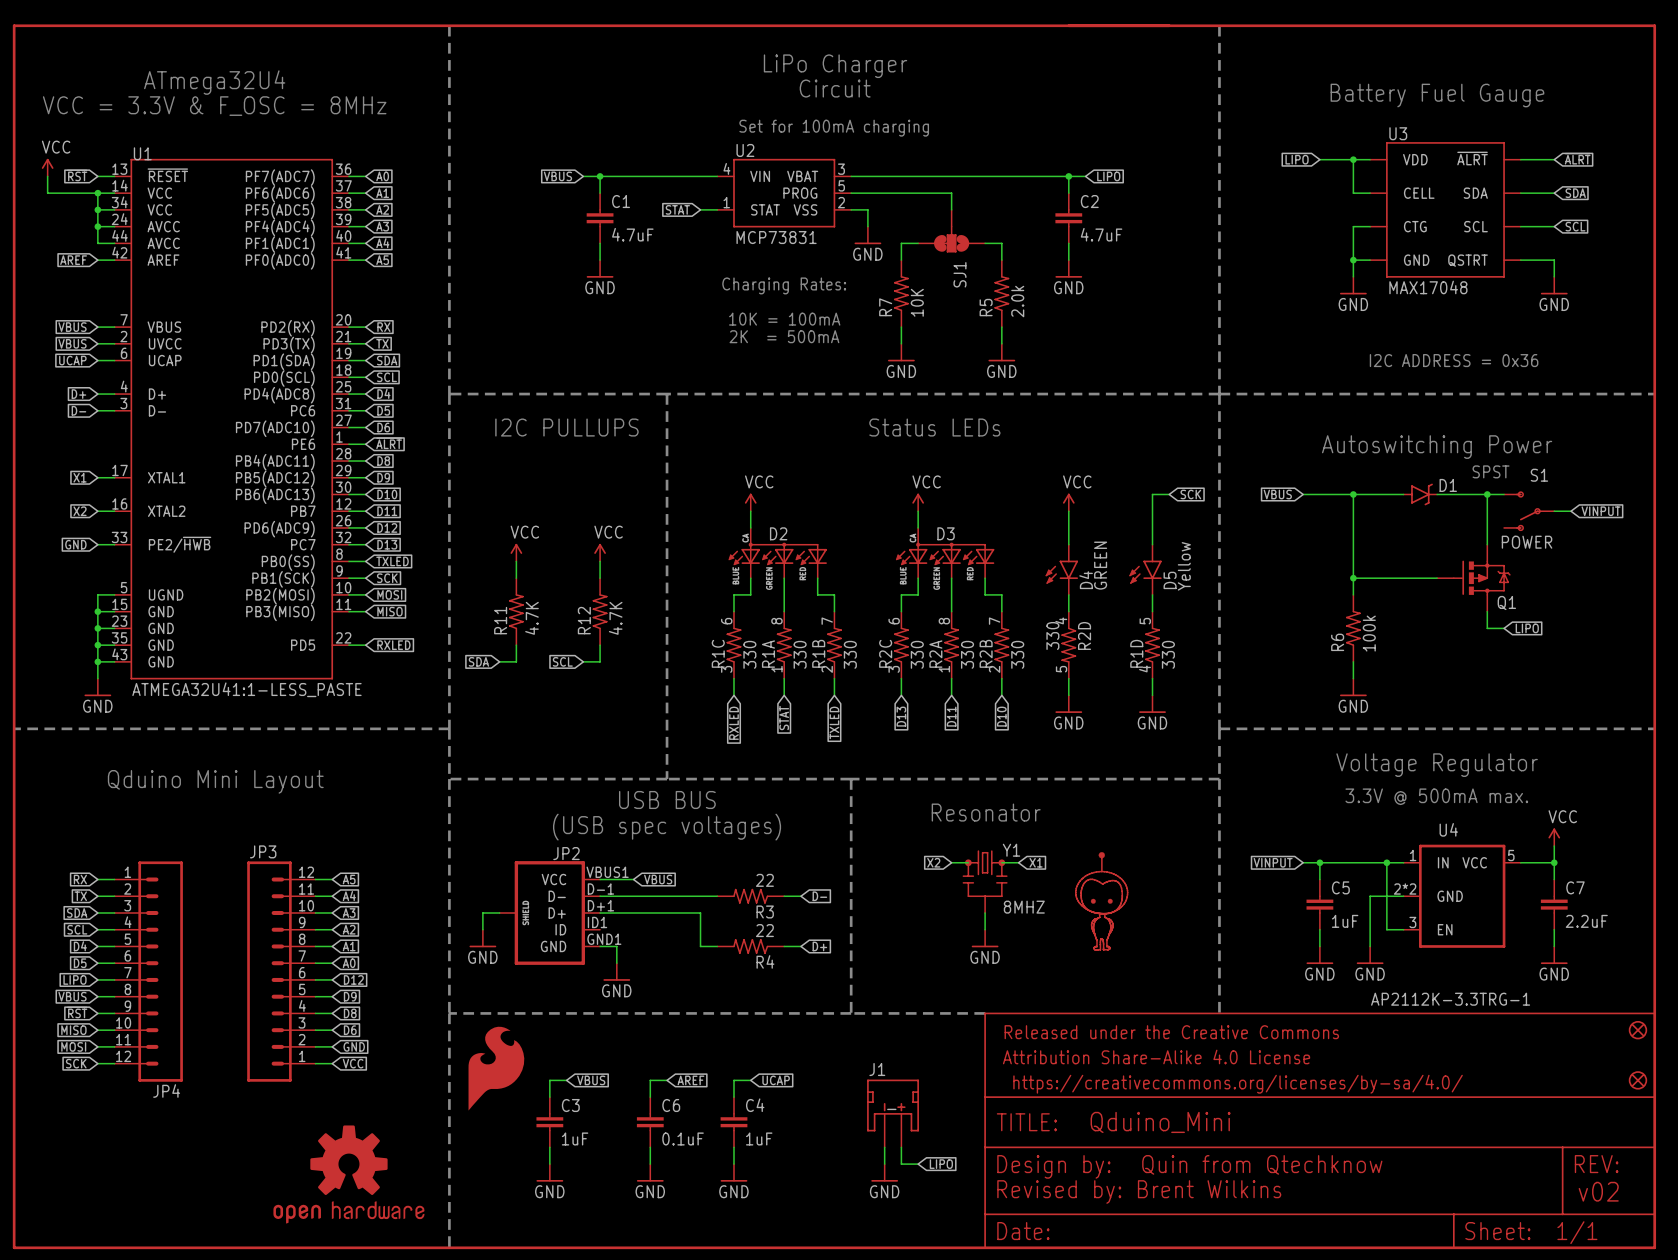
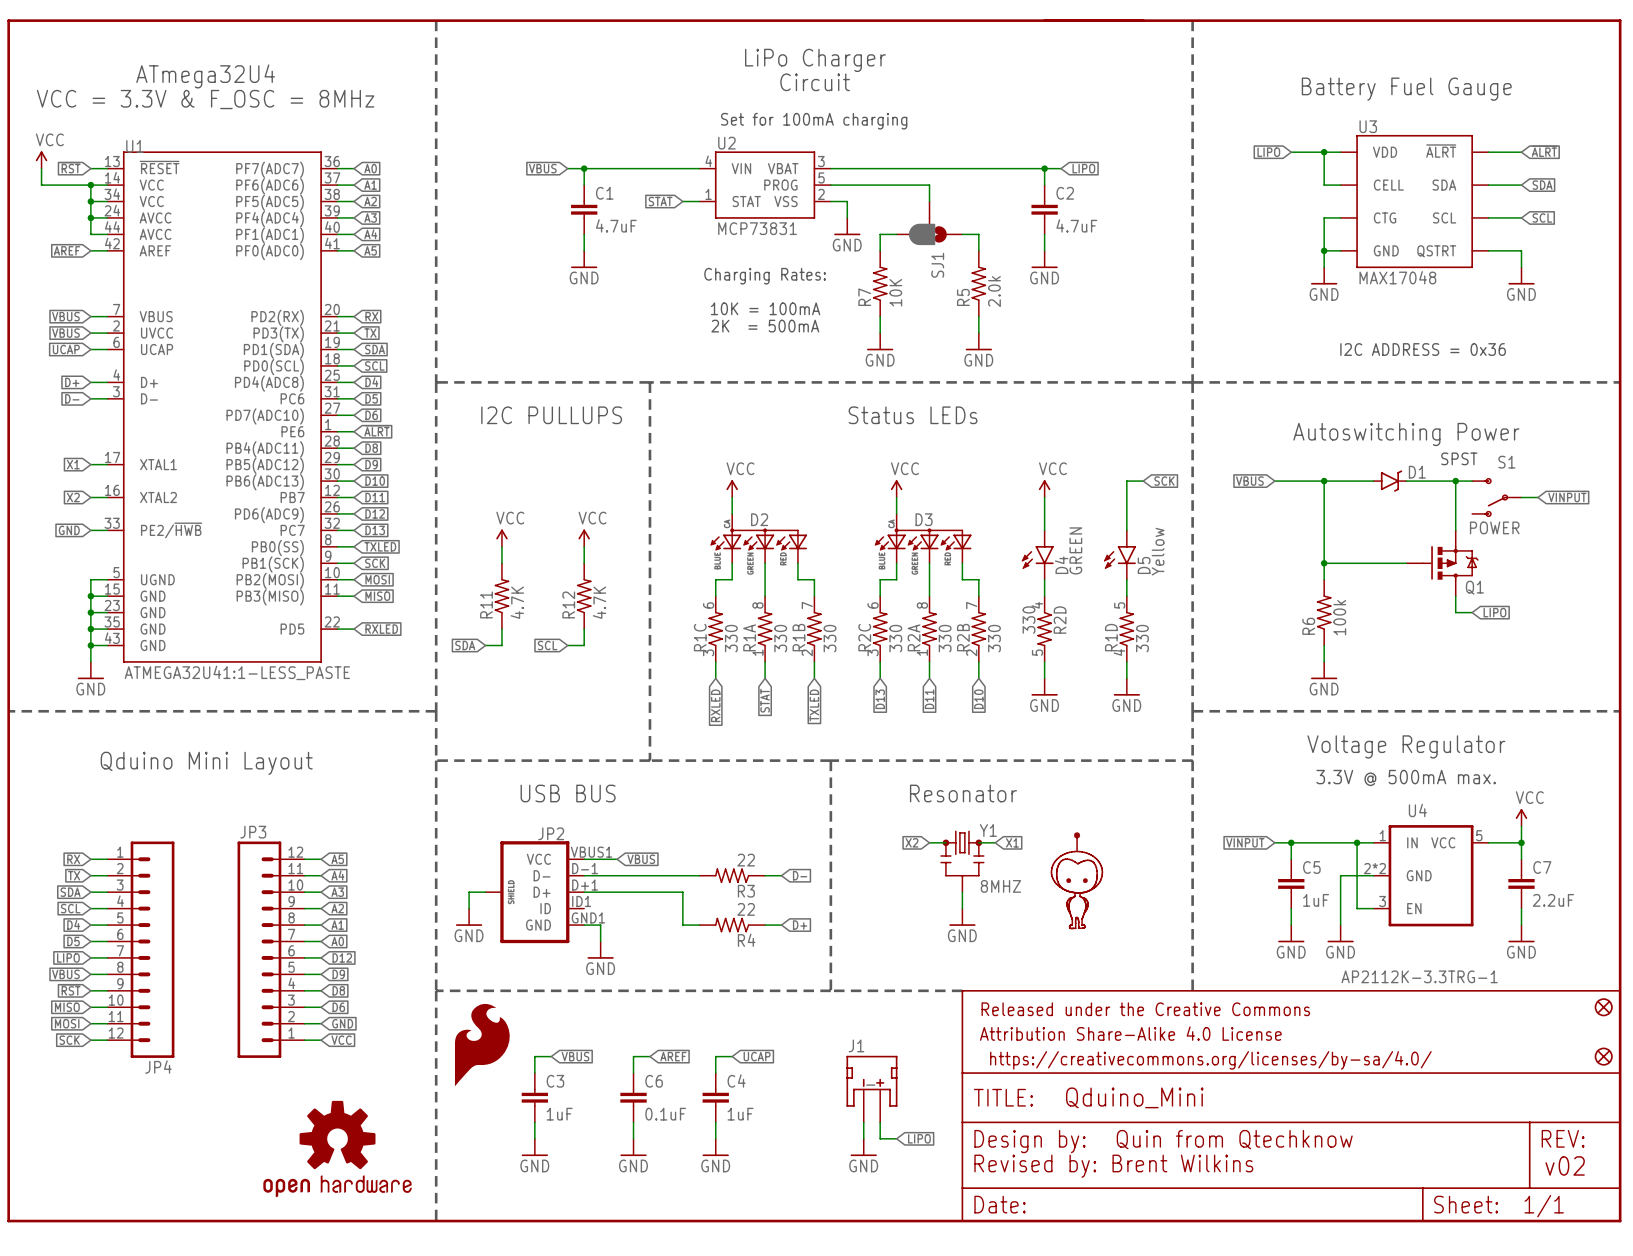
SJ1 symbol: [918, 209, 986, 253] -> [896, 201, 963, 246]
text position: USB BUS (667, 799) -> USB BUS (568, 793)
text: (USB spec voltages) (667, 827) -> none

